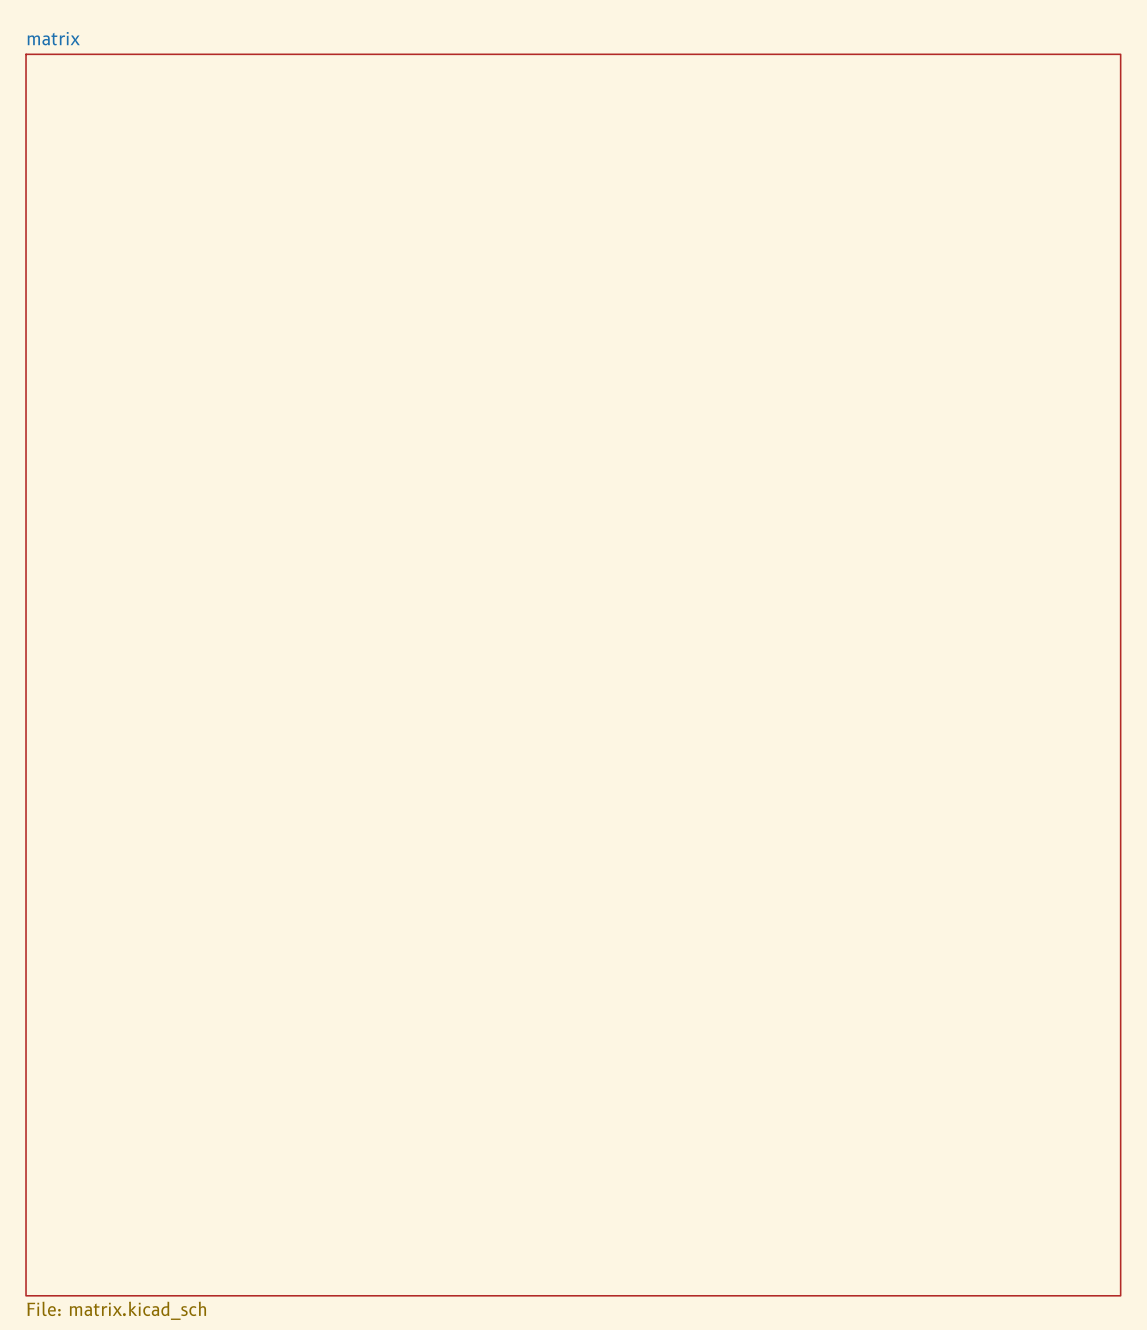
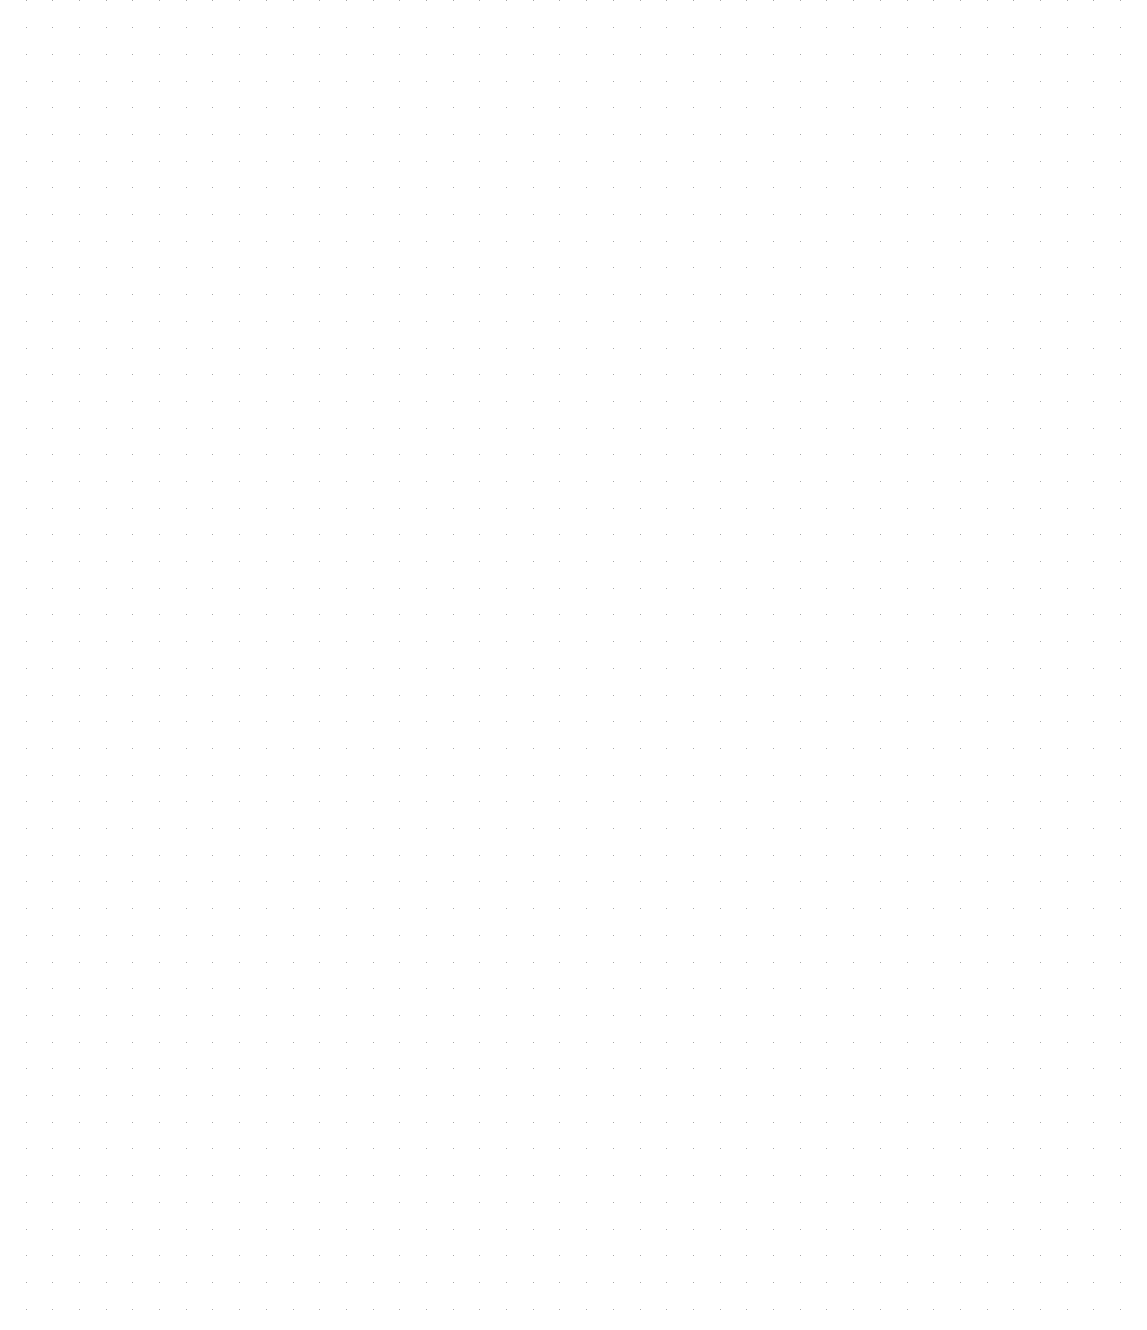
sheet matrix: File: matrix.kicad_sch (573, 675) -> none

